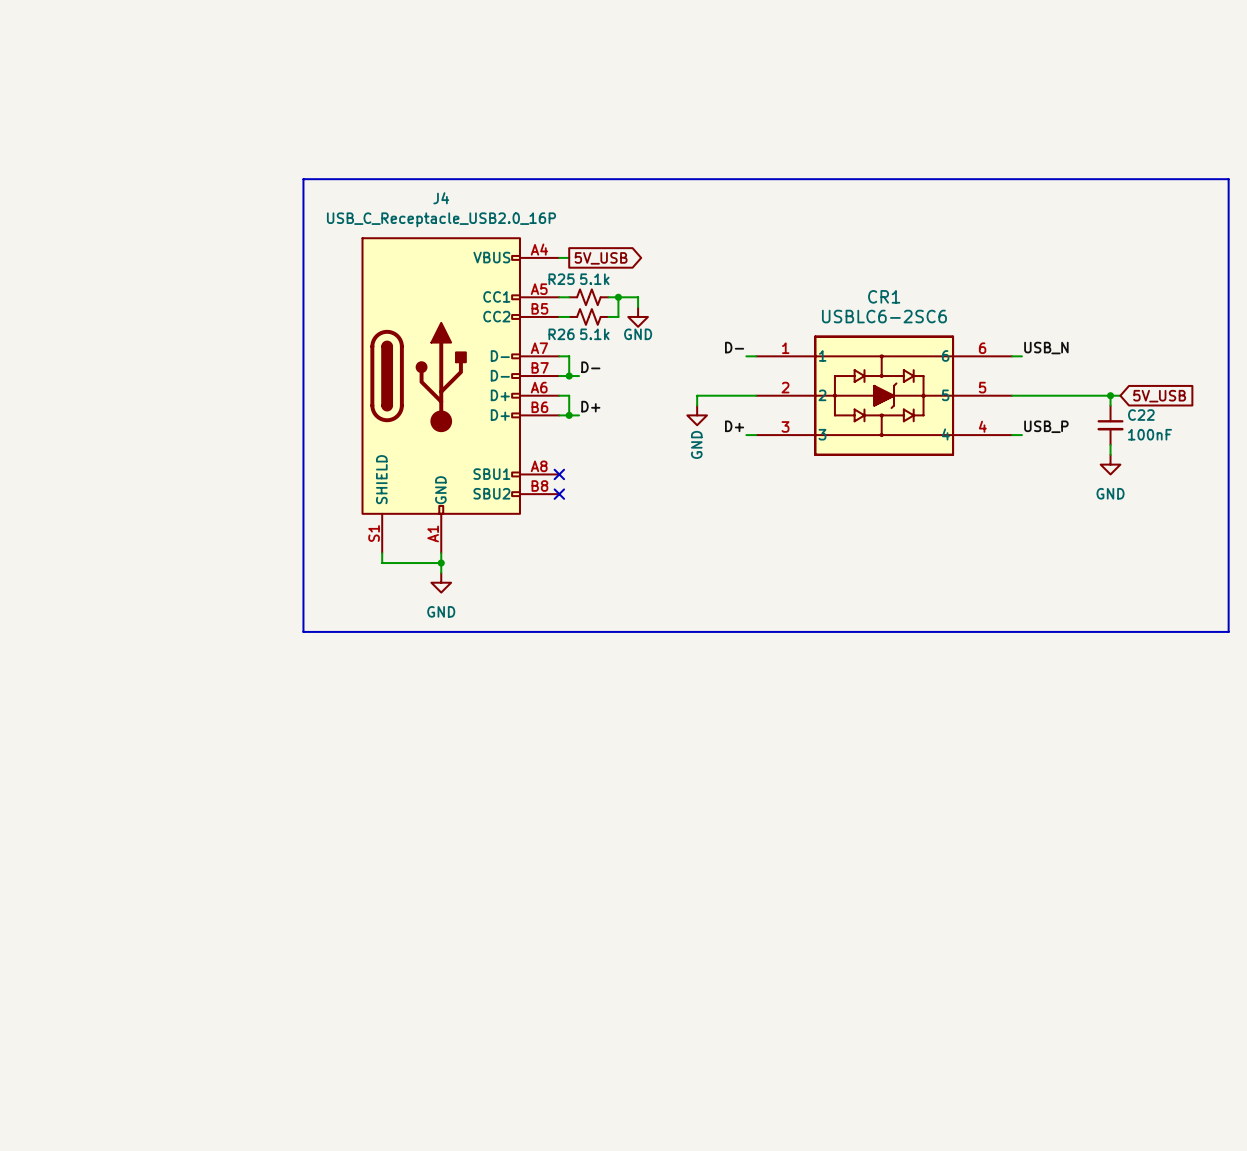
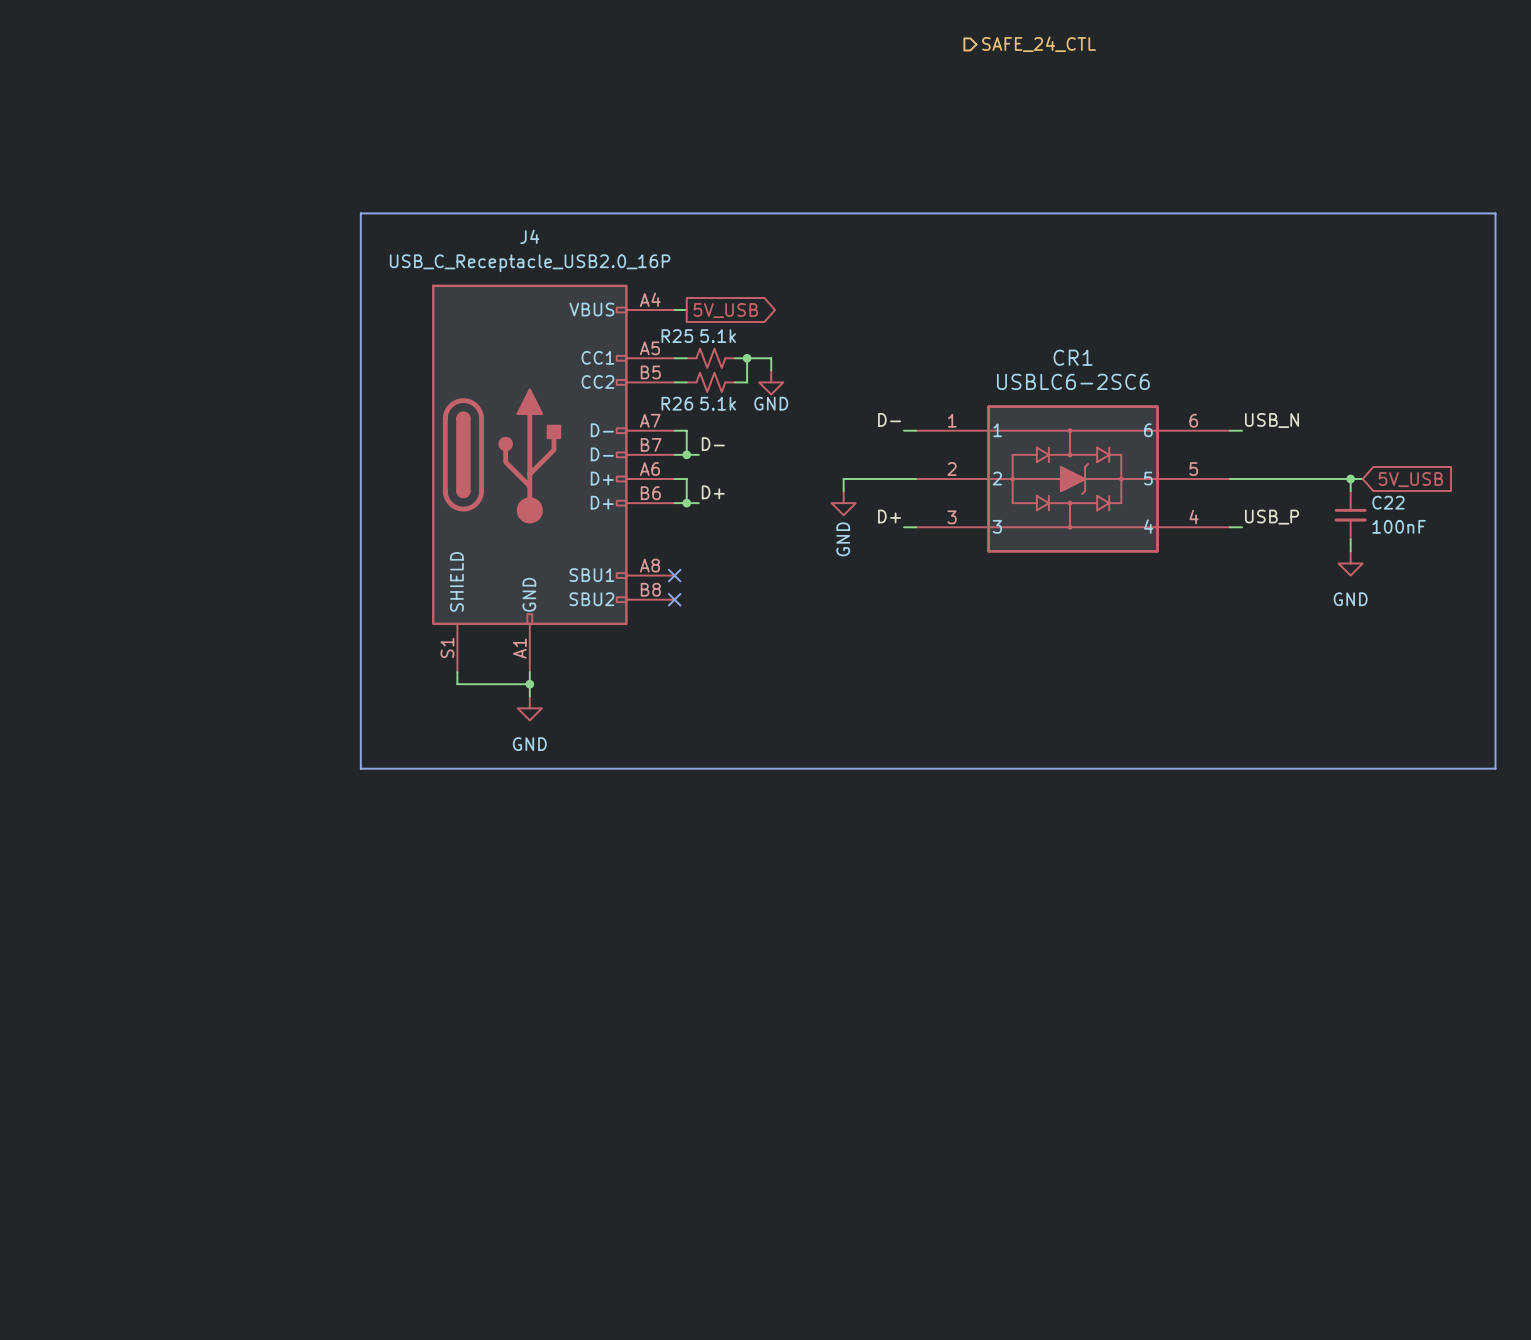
hierarchical label: none -> SAFE_24_CTL (1039, 44)

